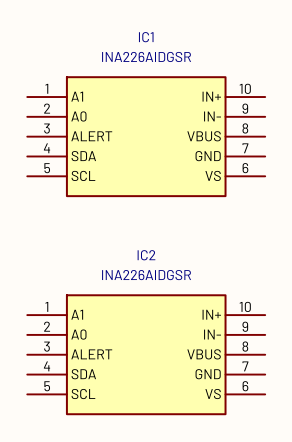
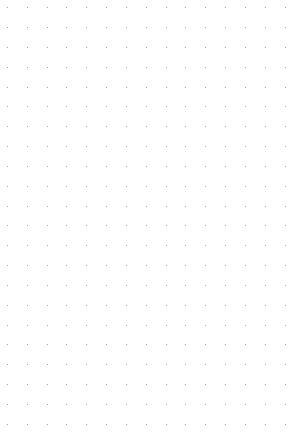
IC1: INA226AIDGSR (146, 136) -> none
IC2: INA226AIDGSR (146, 354) -> none

